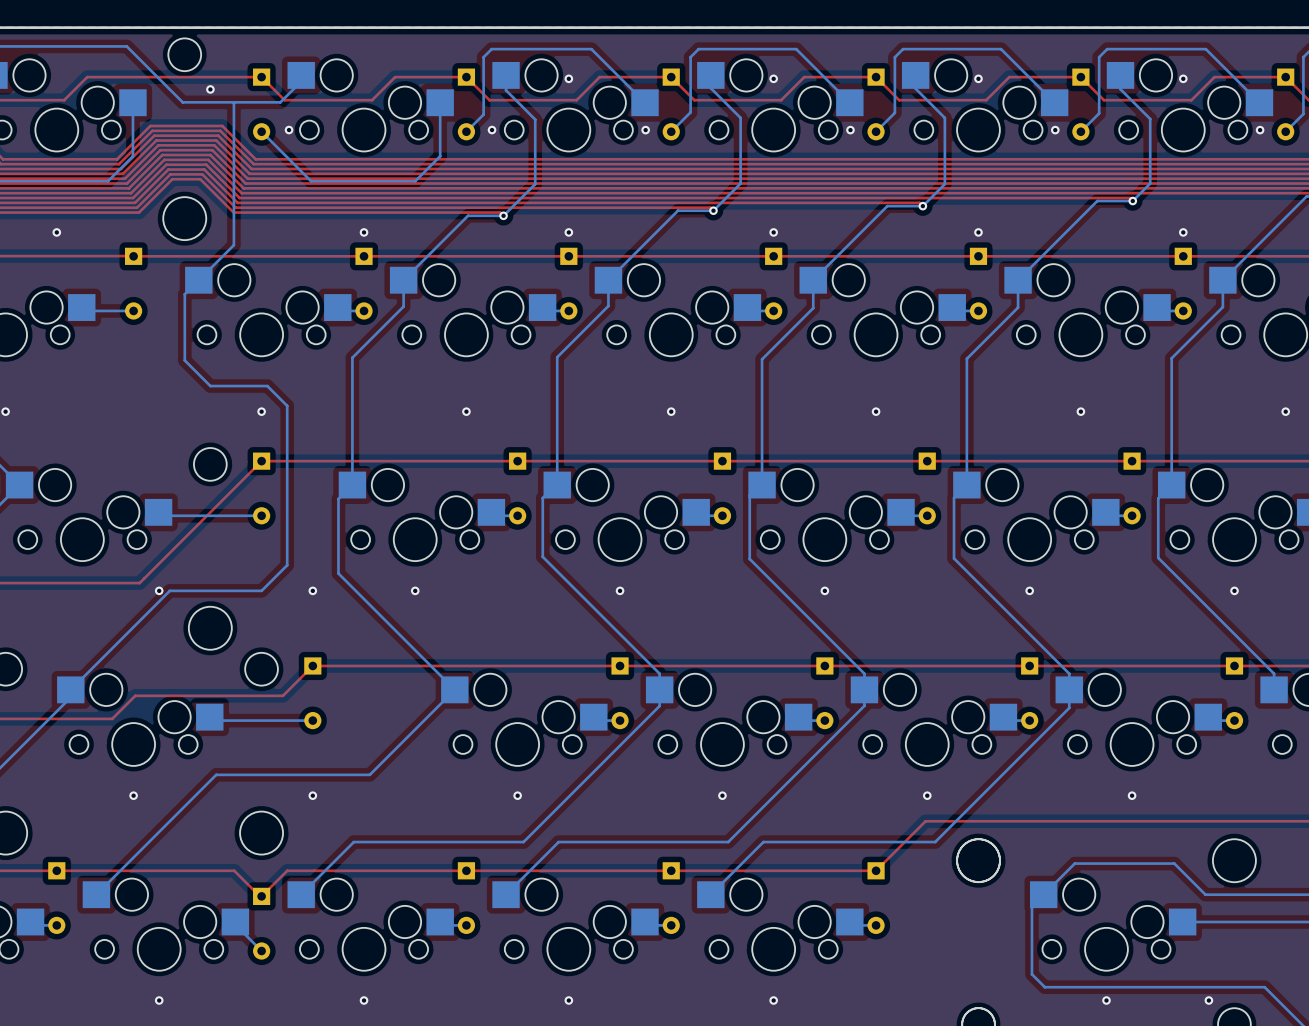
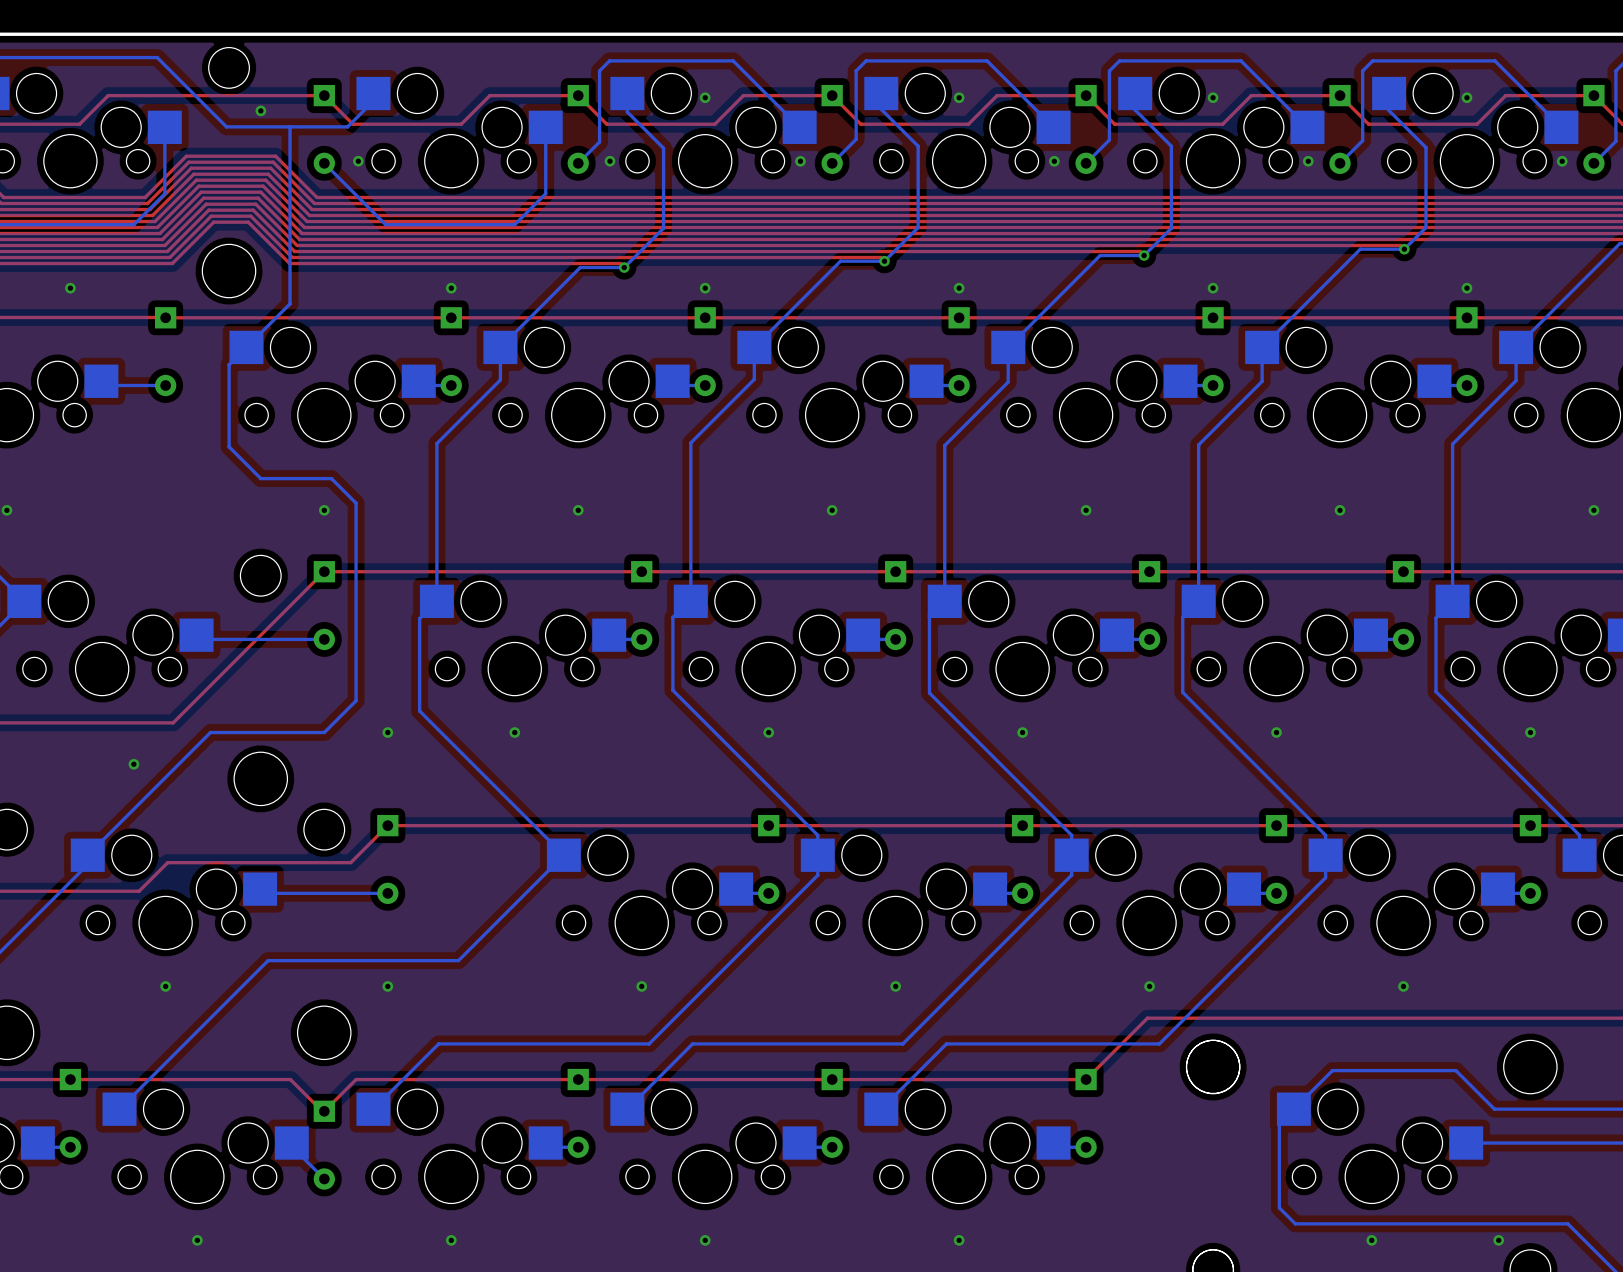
via position: (159, 590) -> (133, 764)

